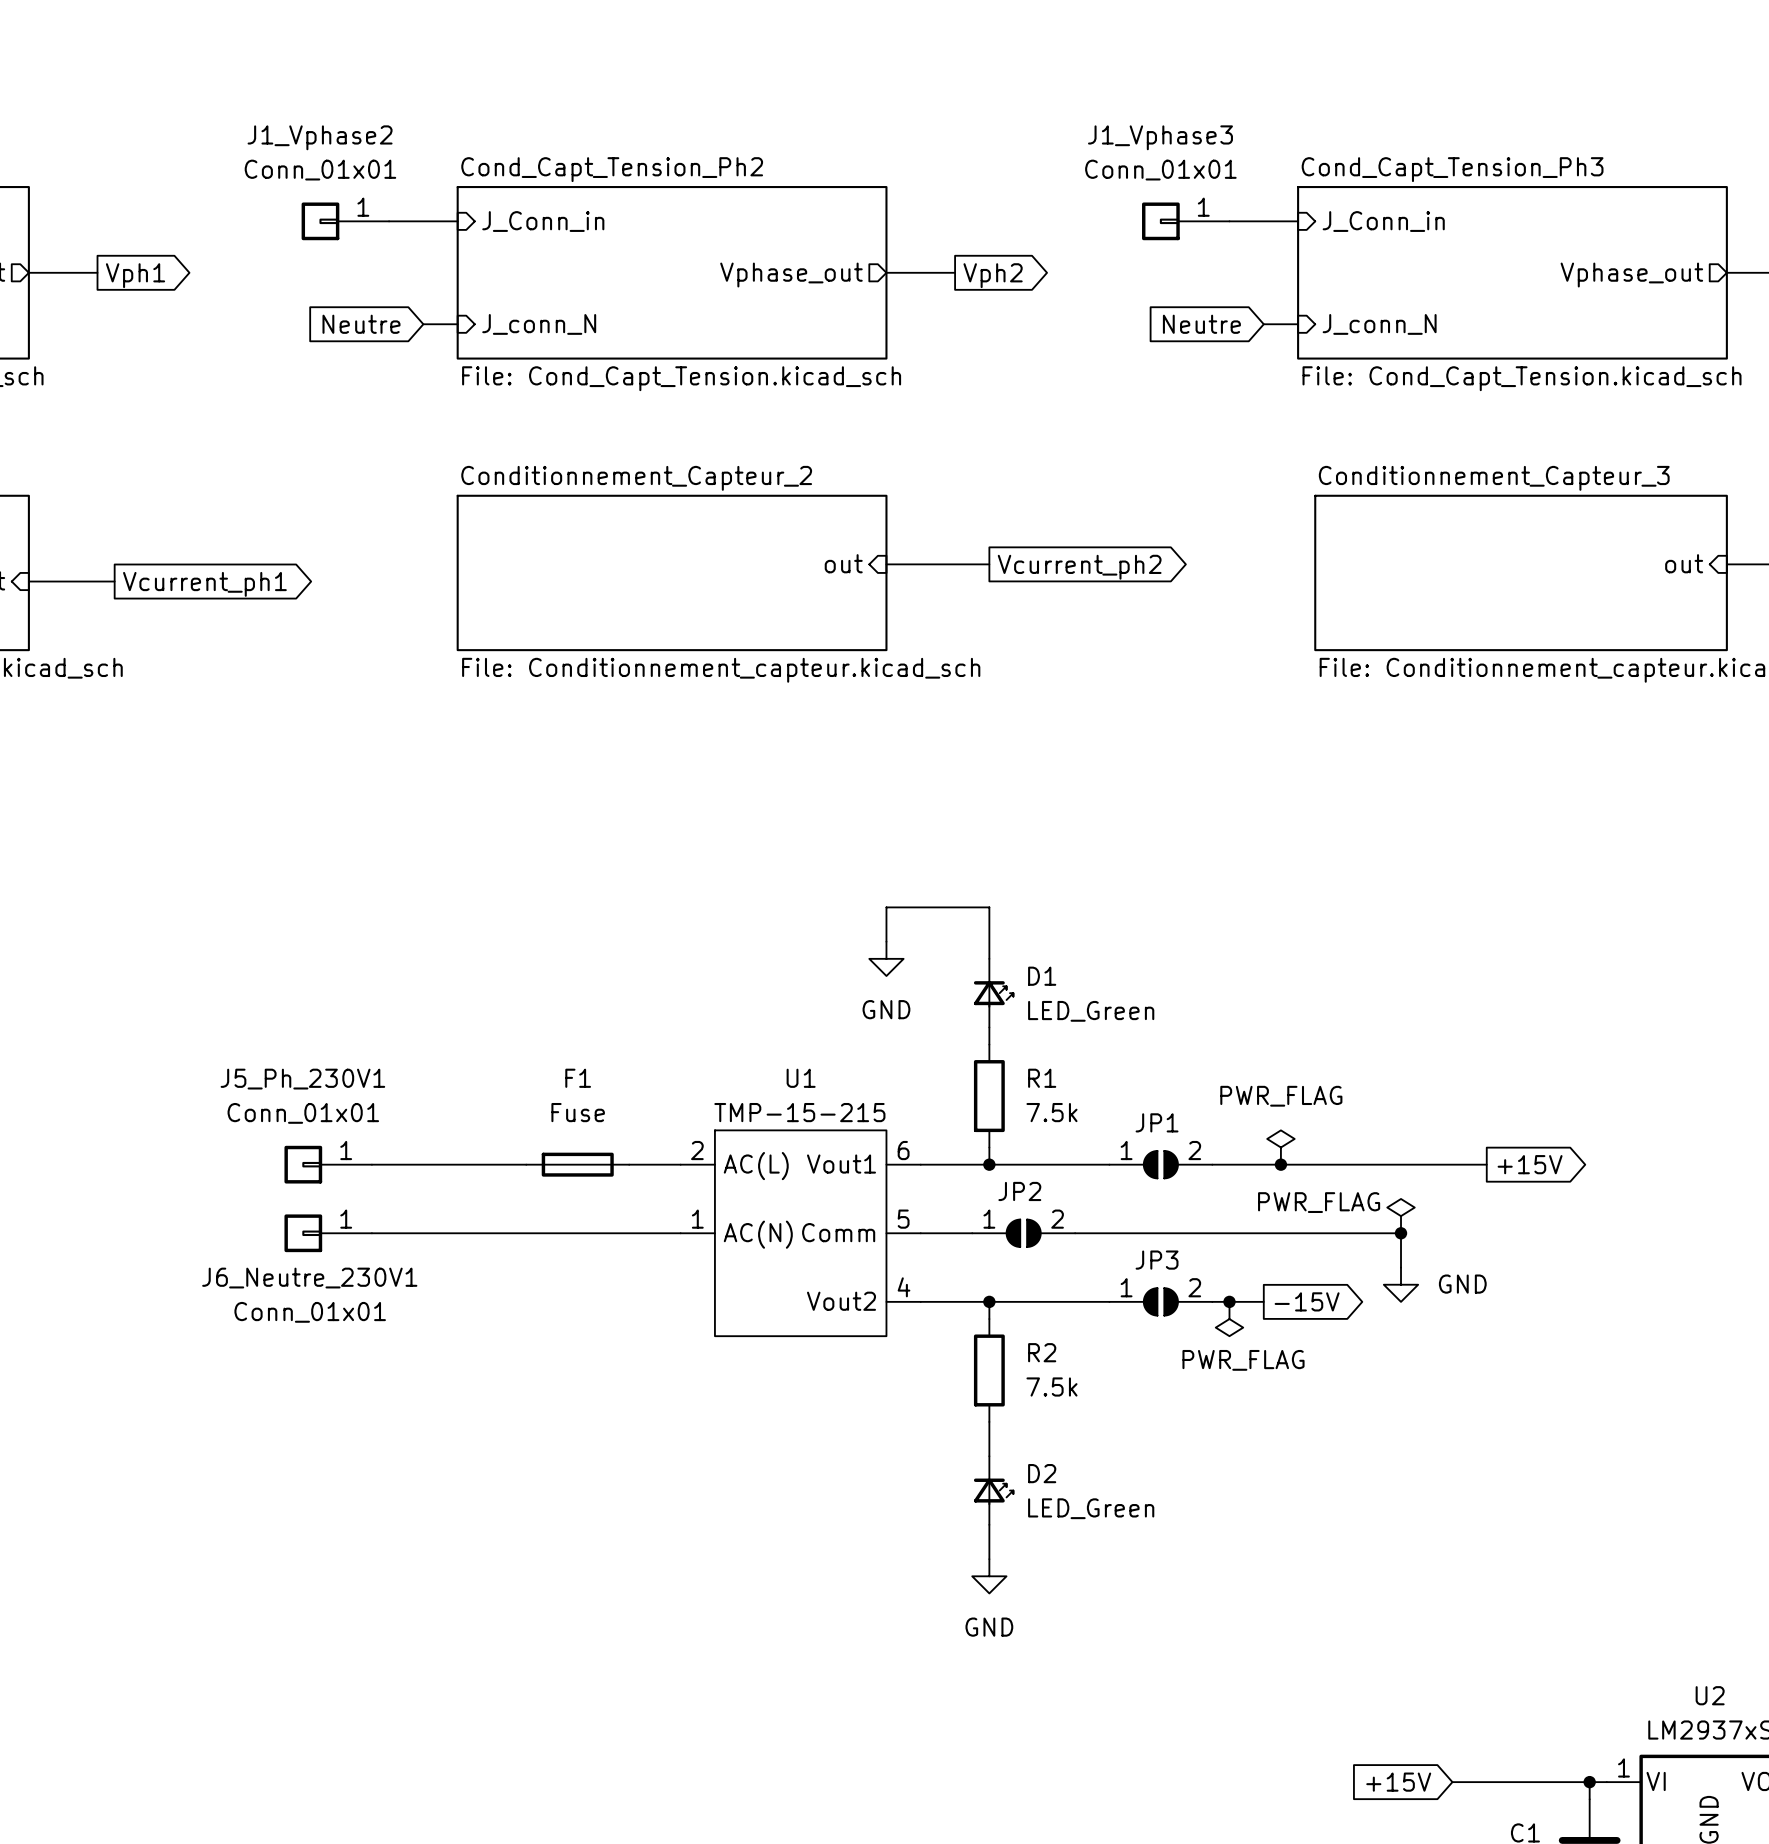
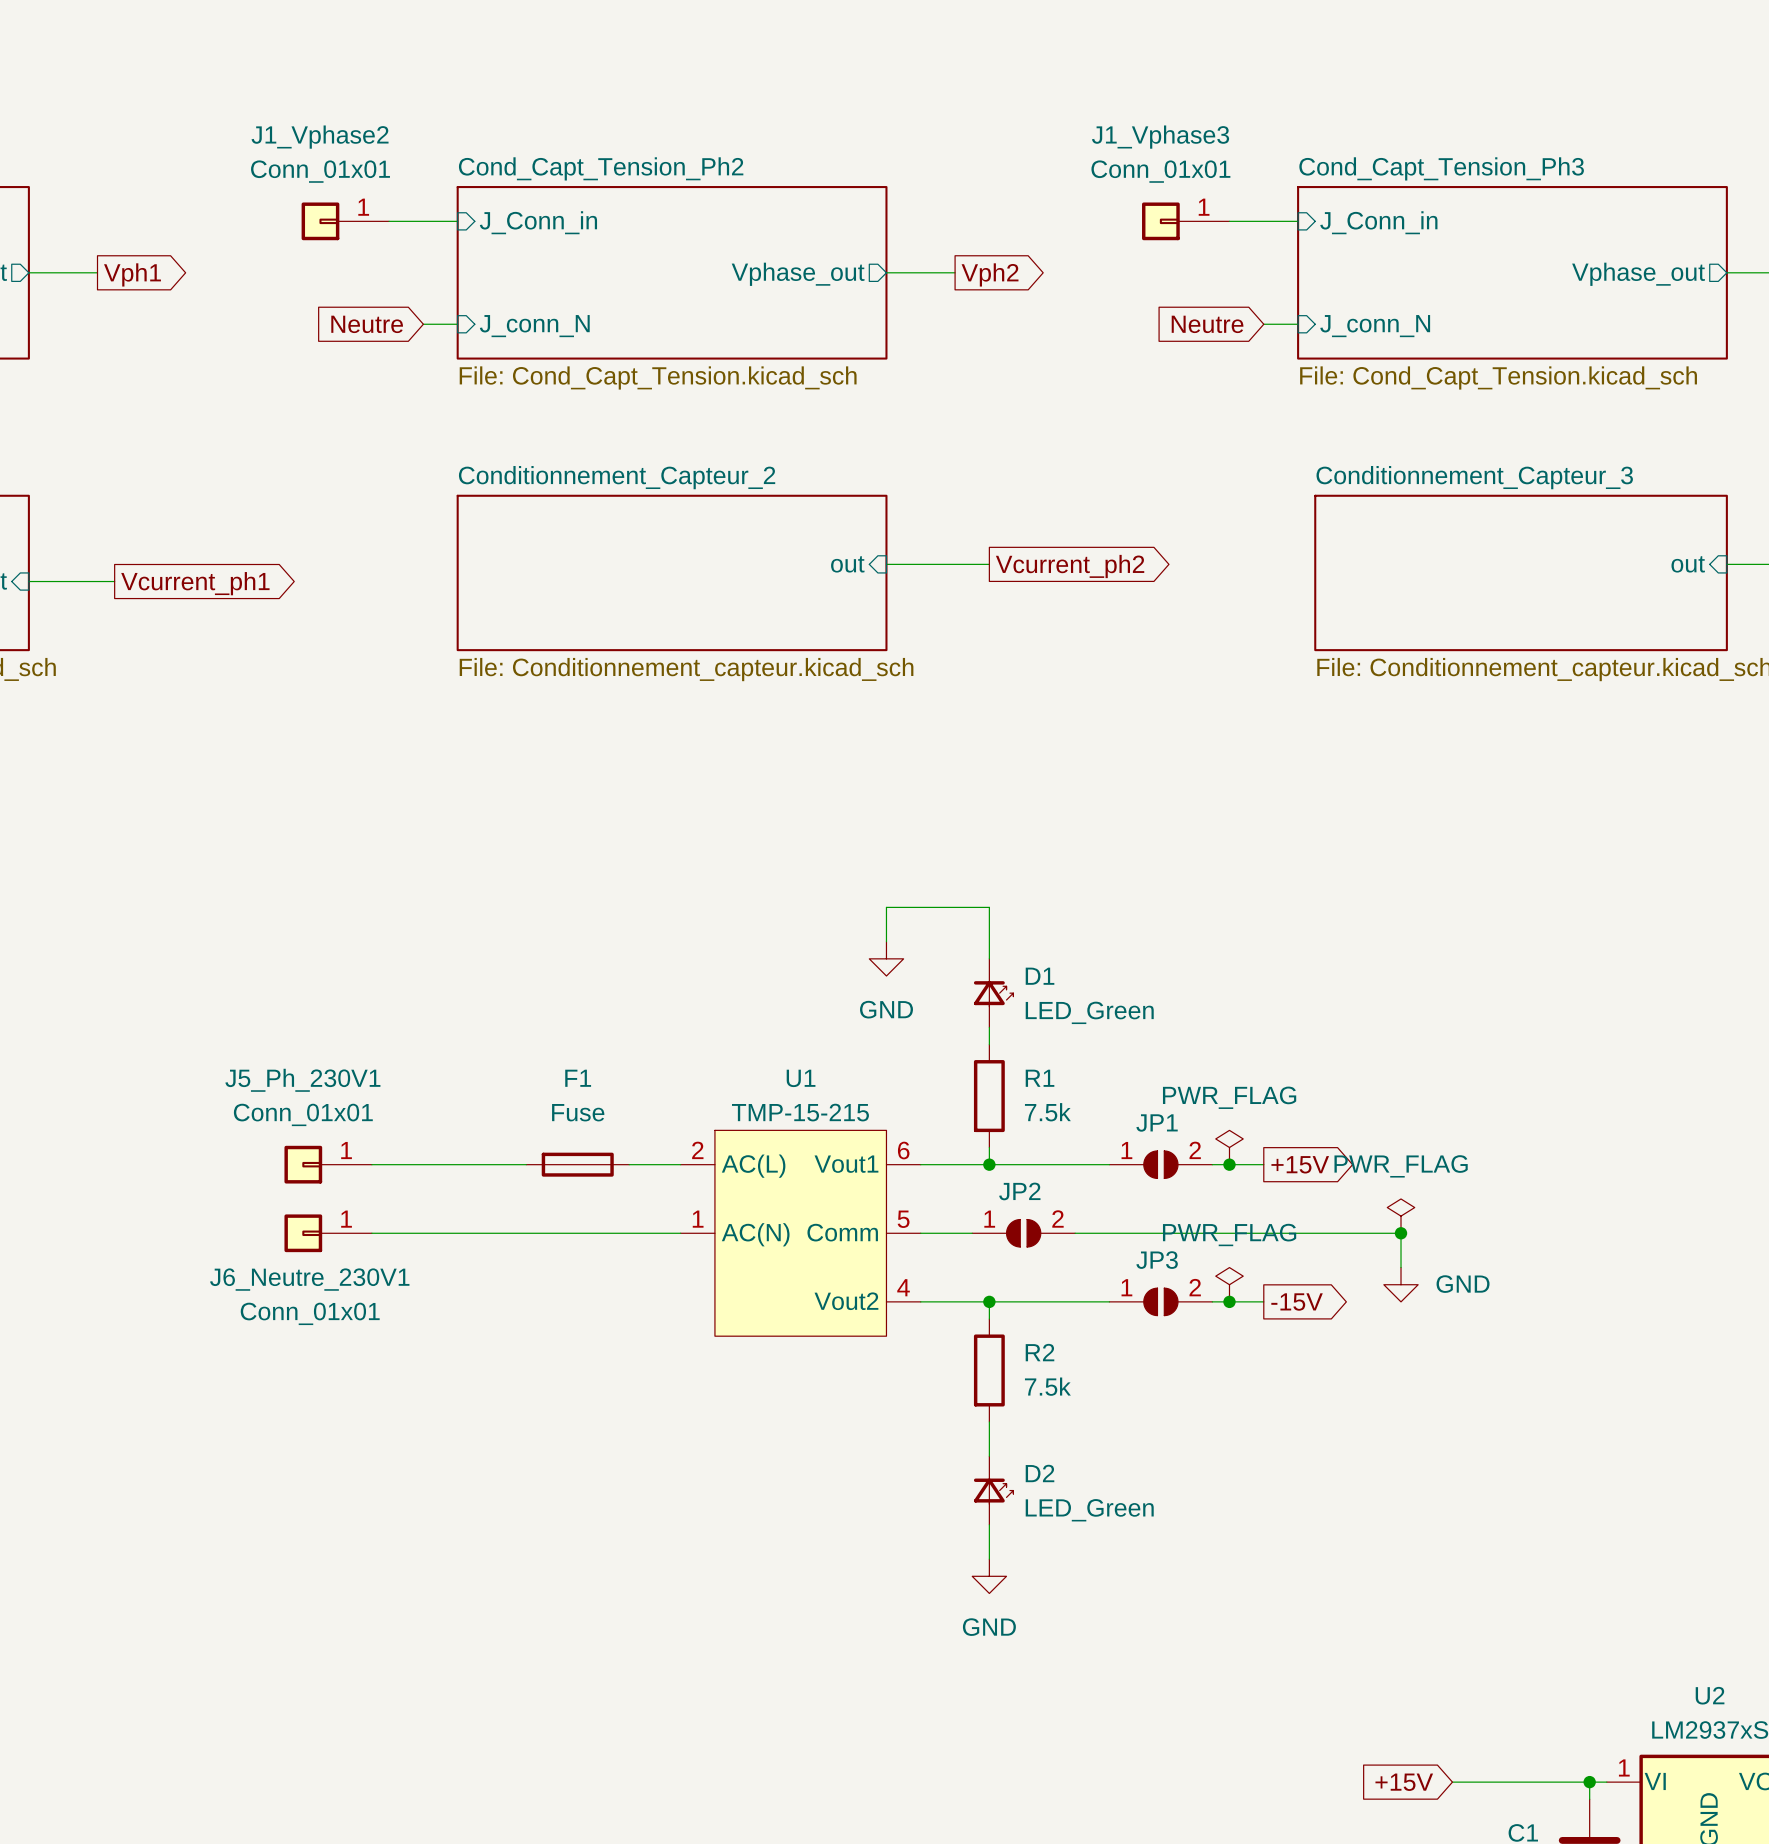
power symbol position: PWR_FLAG (1280, 1147) -> PWR_FLAG (1229, 1147)
wire: (1263, 1164) (1486, 1164) -> none
junction position: (1280, 1164) -> (1229, 1164)
global label position: +15V (1530, 1164) -> +15V (1300, 1164)
power symbol text position: PWR_FLAG (1319, 1202) -> PWR_FLAG (1401, 1166)
power symbol rotation: 0° (1229, 1319) -> 180° (1229, 1284)
power symbol position: PWR_FLAG (1229, 1319) -> PWR_FLAG (1229, 1284)

